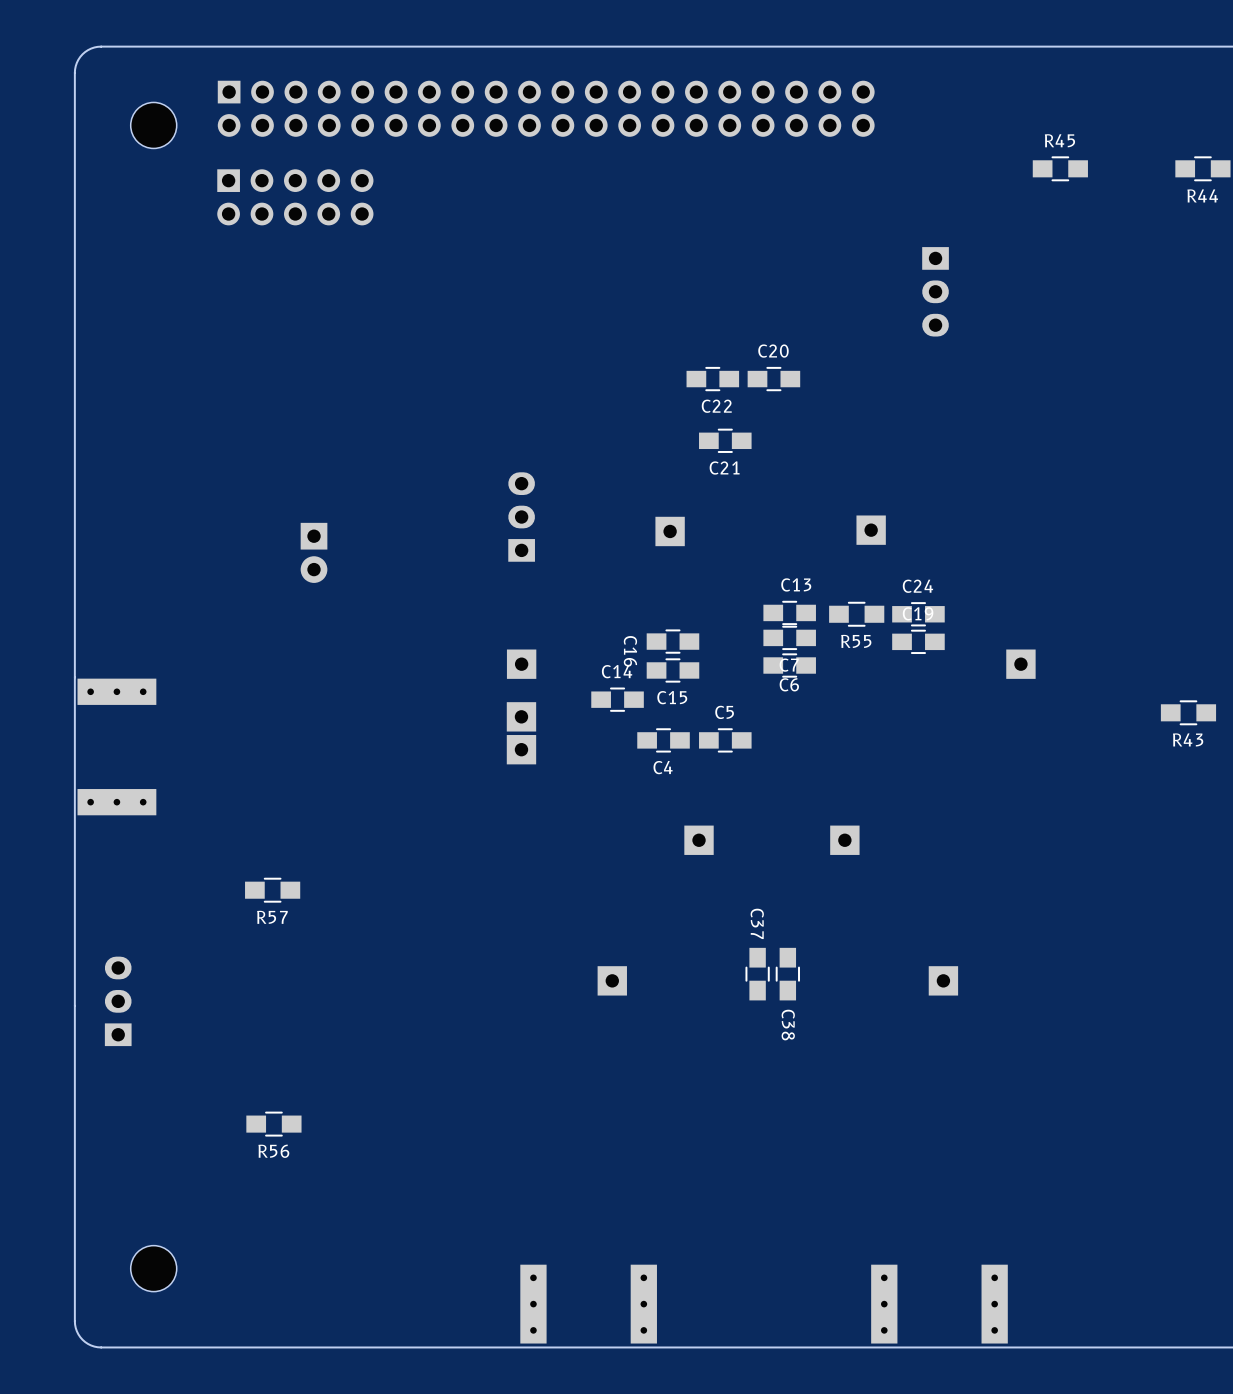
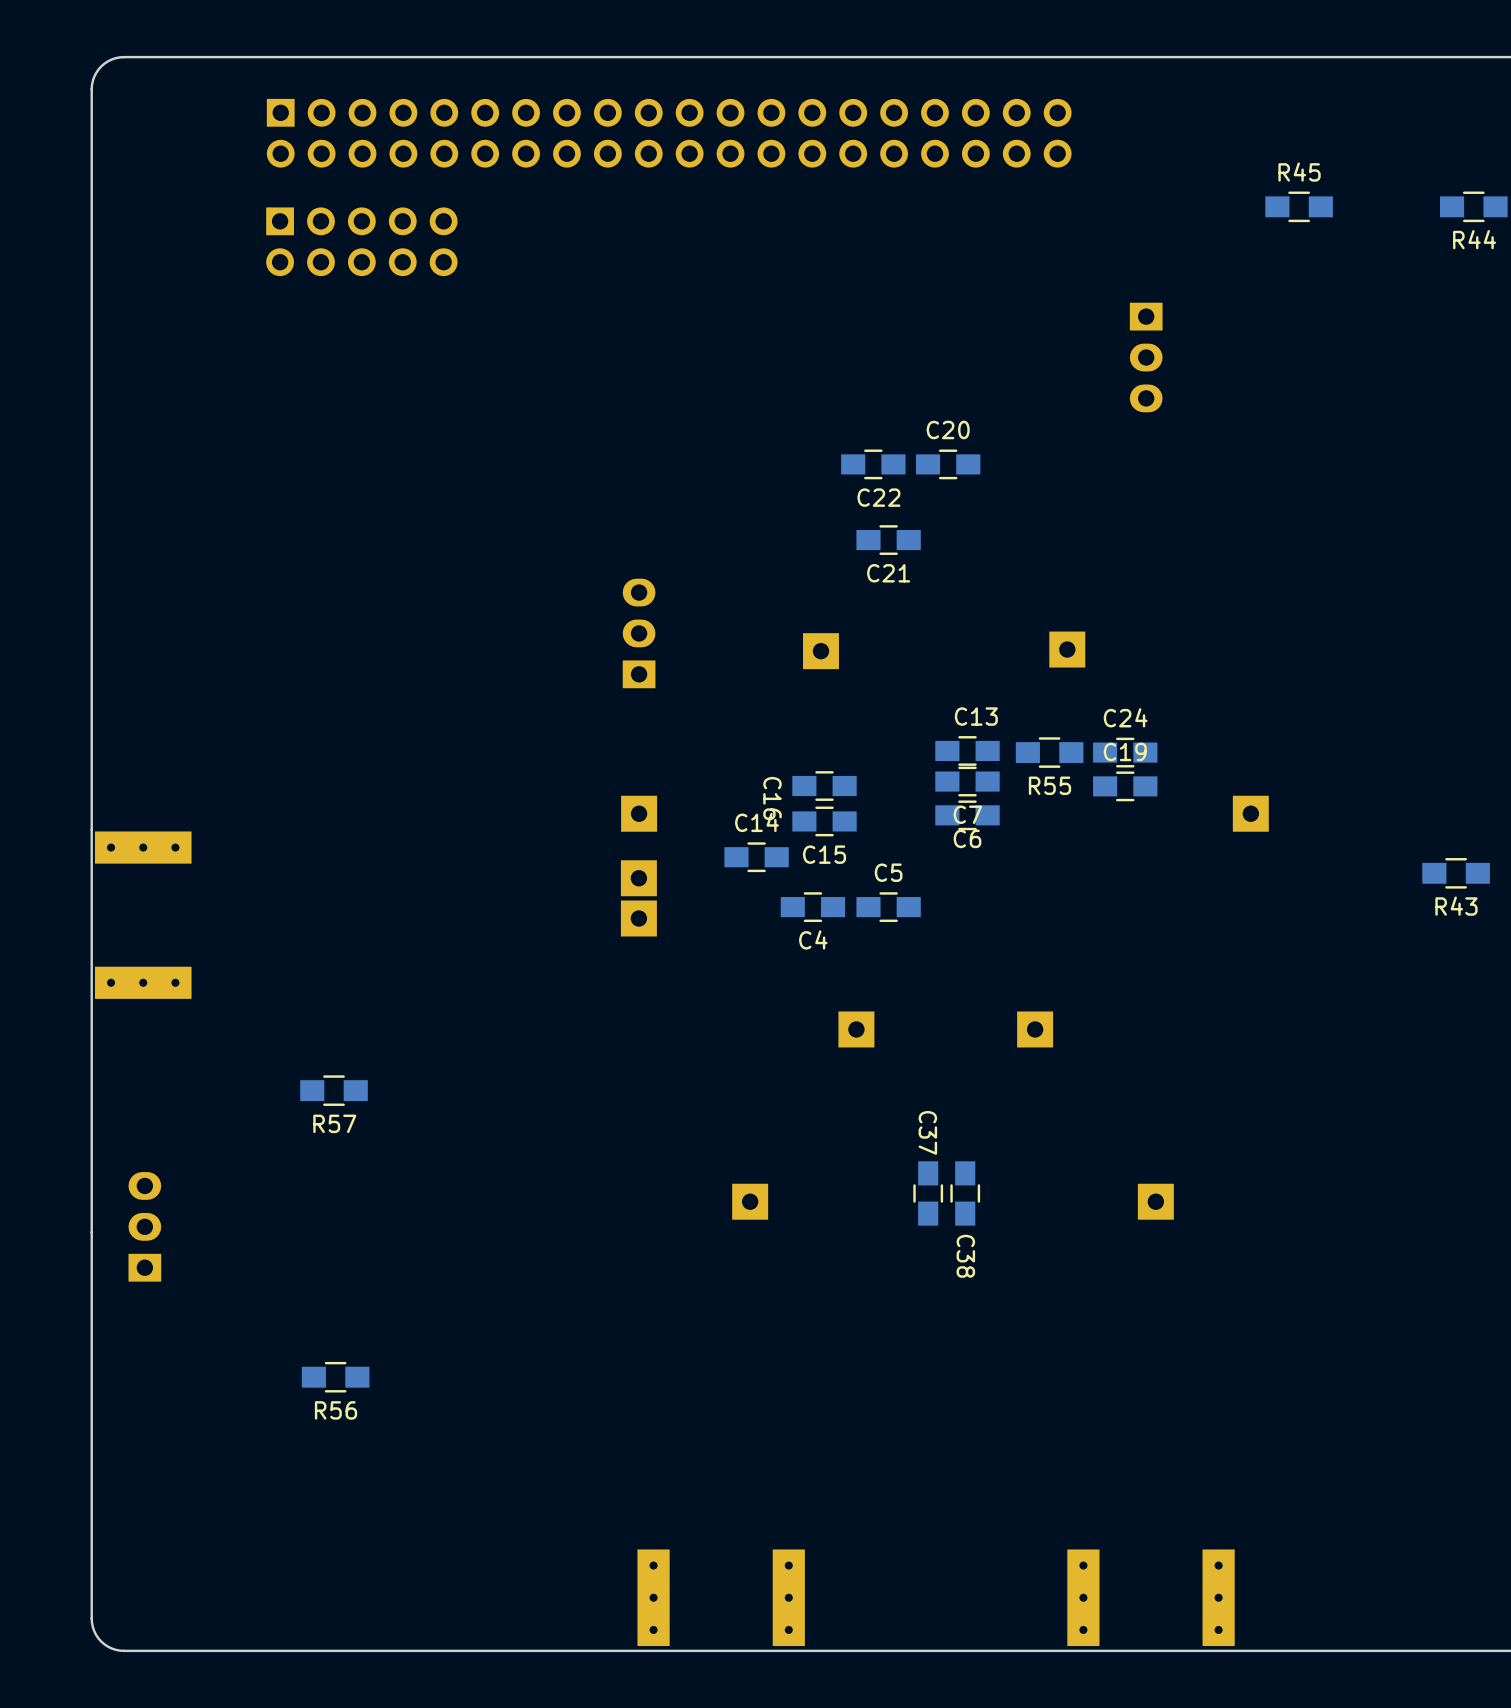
part: (153, 125) -> none
part: (314, 552) -> none
part: (153, 1268) -> none

